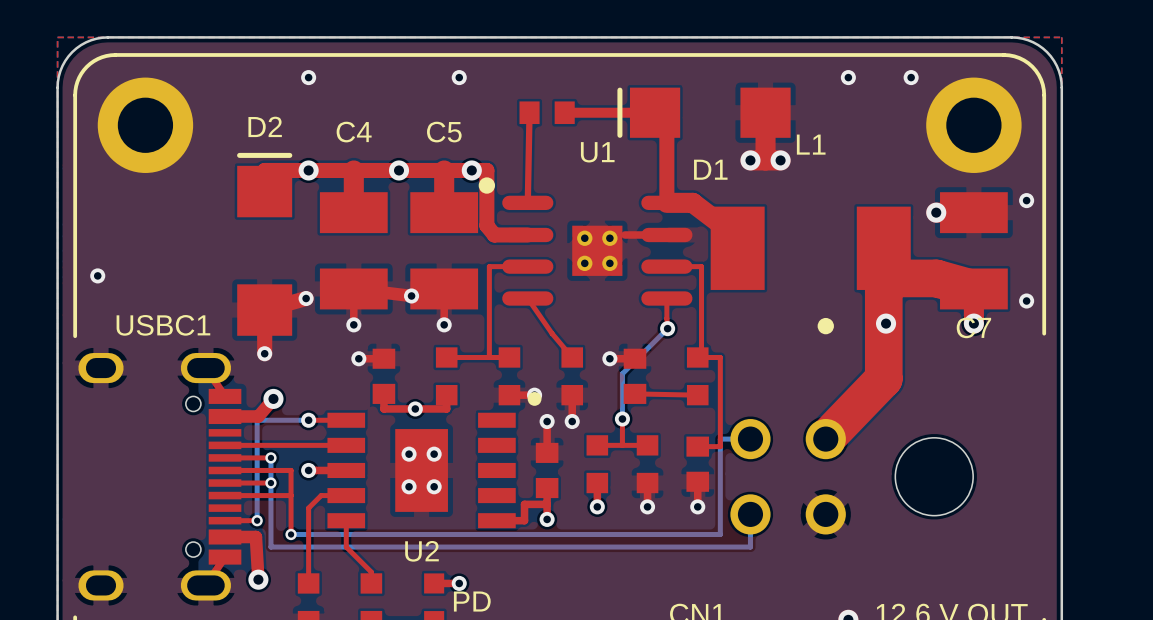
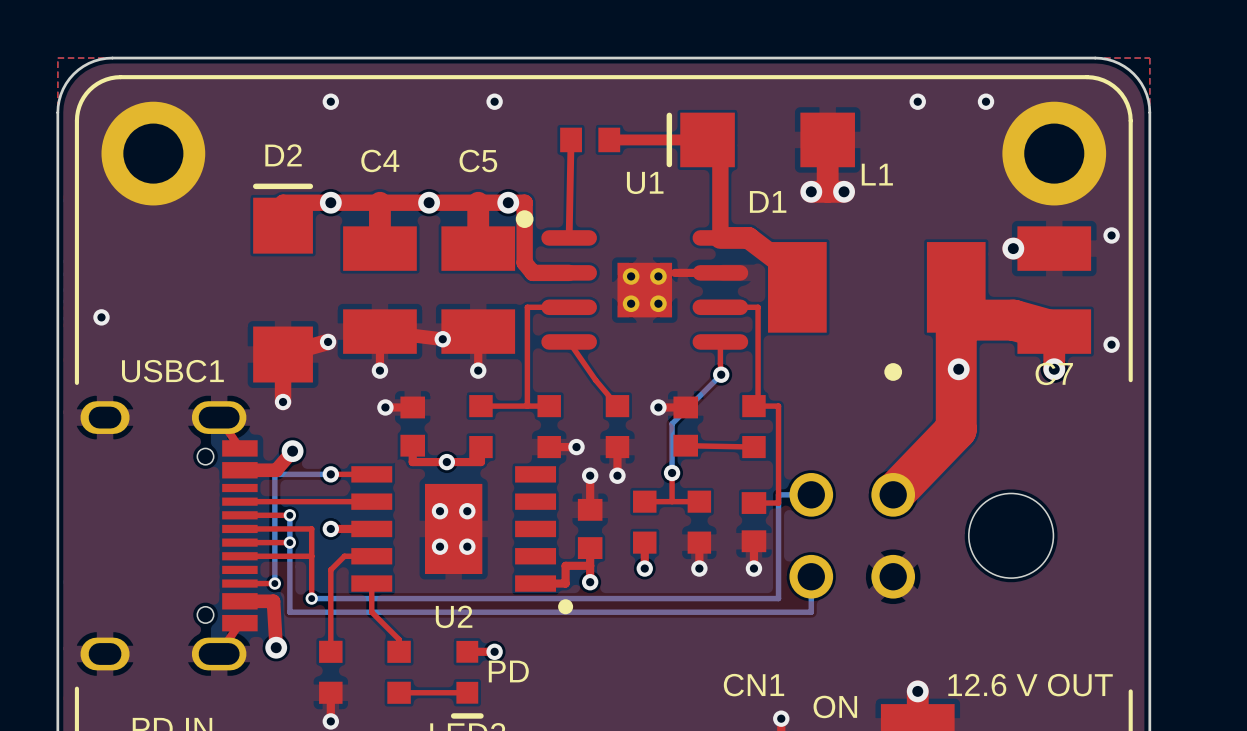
drawing position: (534, 398) -> (565, 606)

